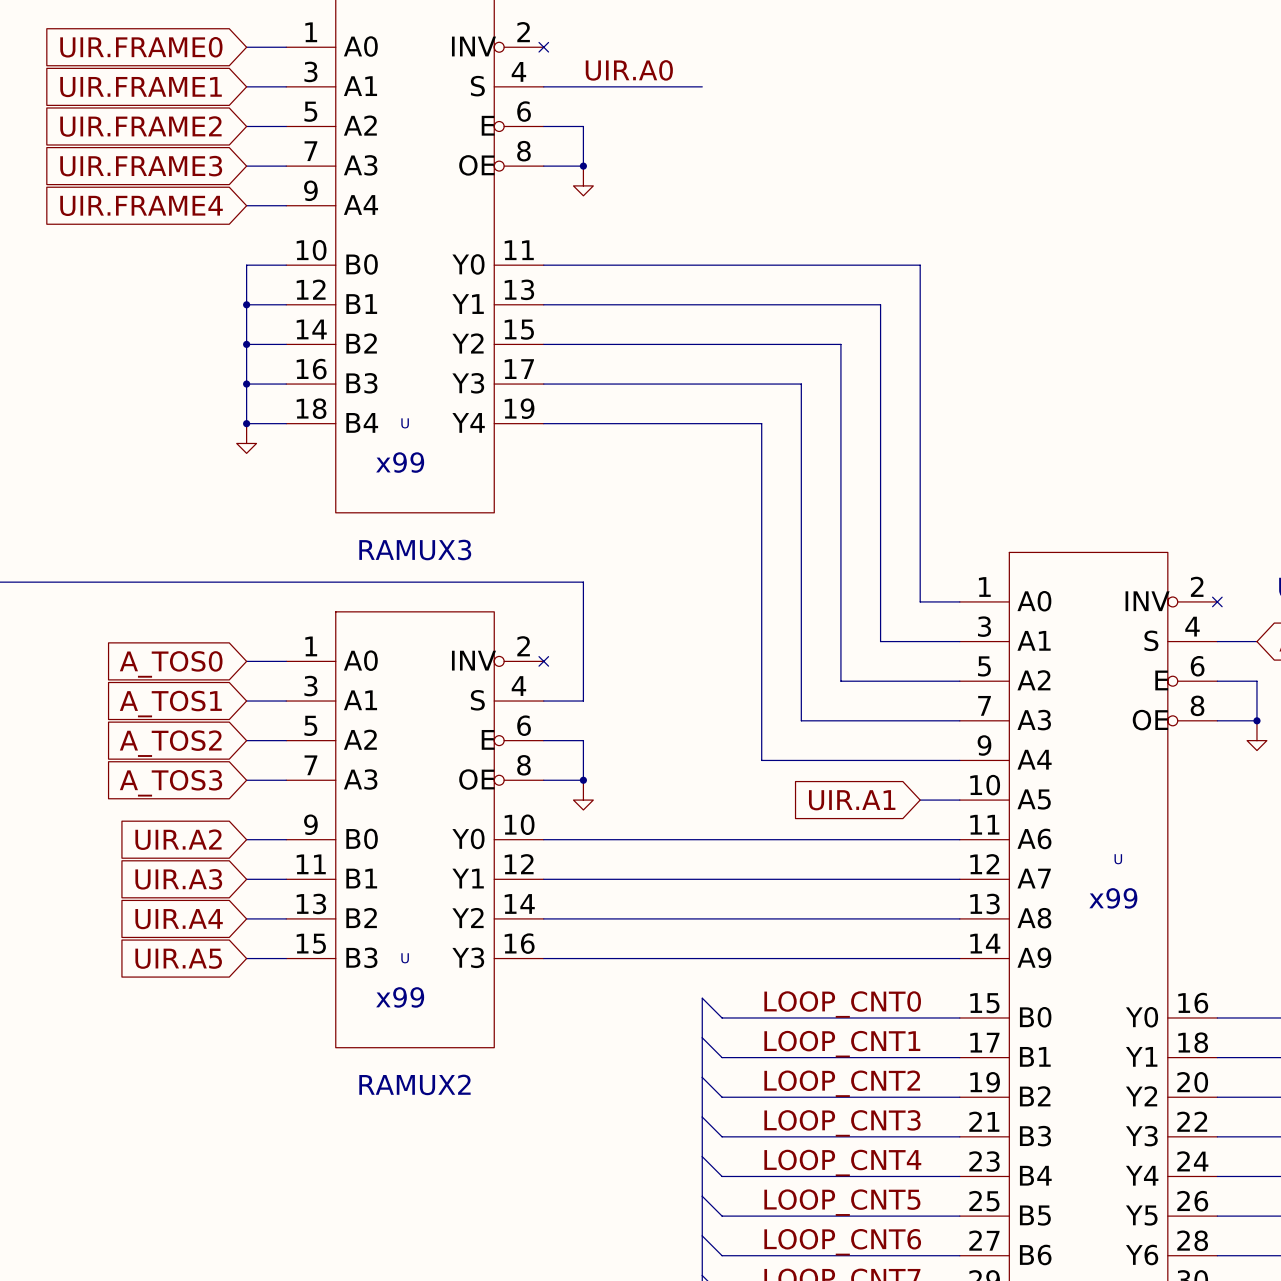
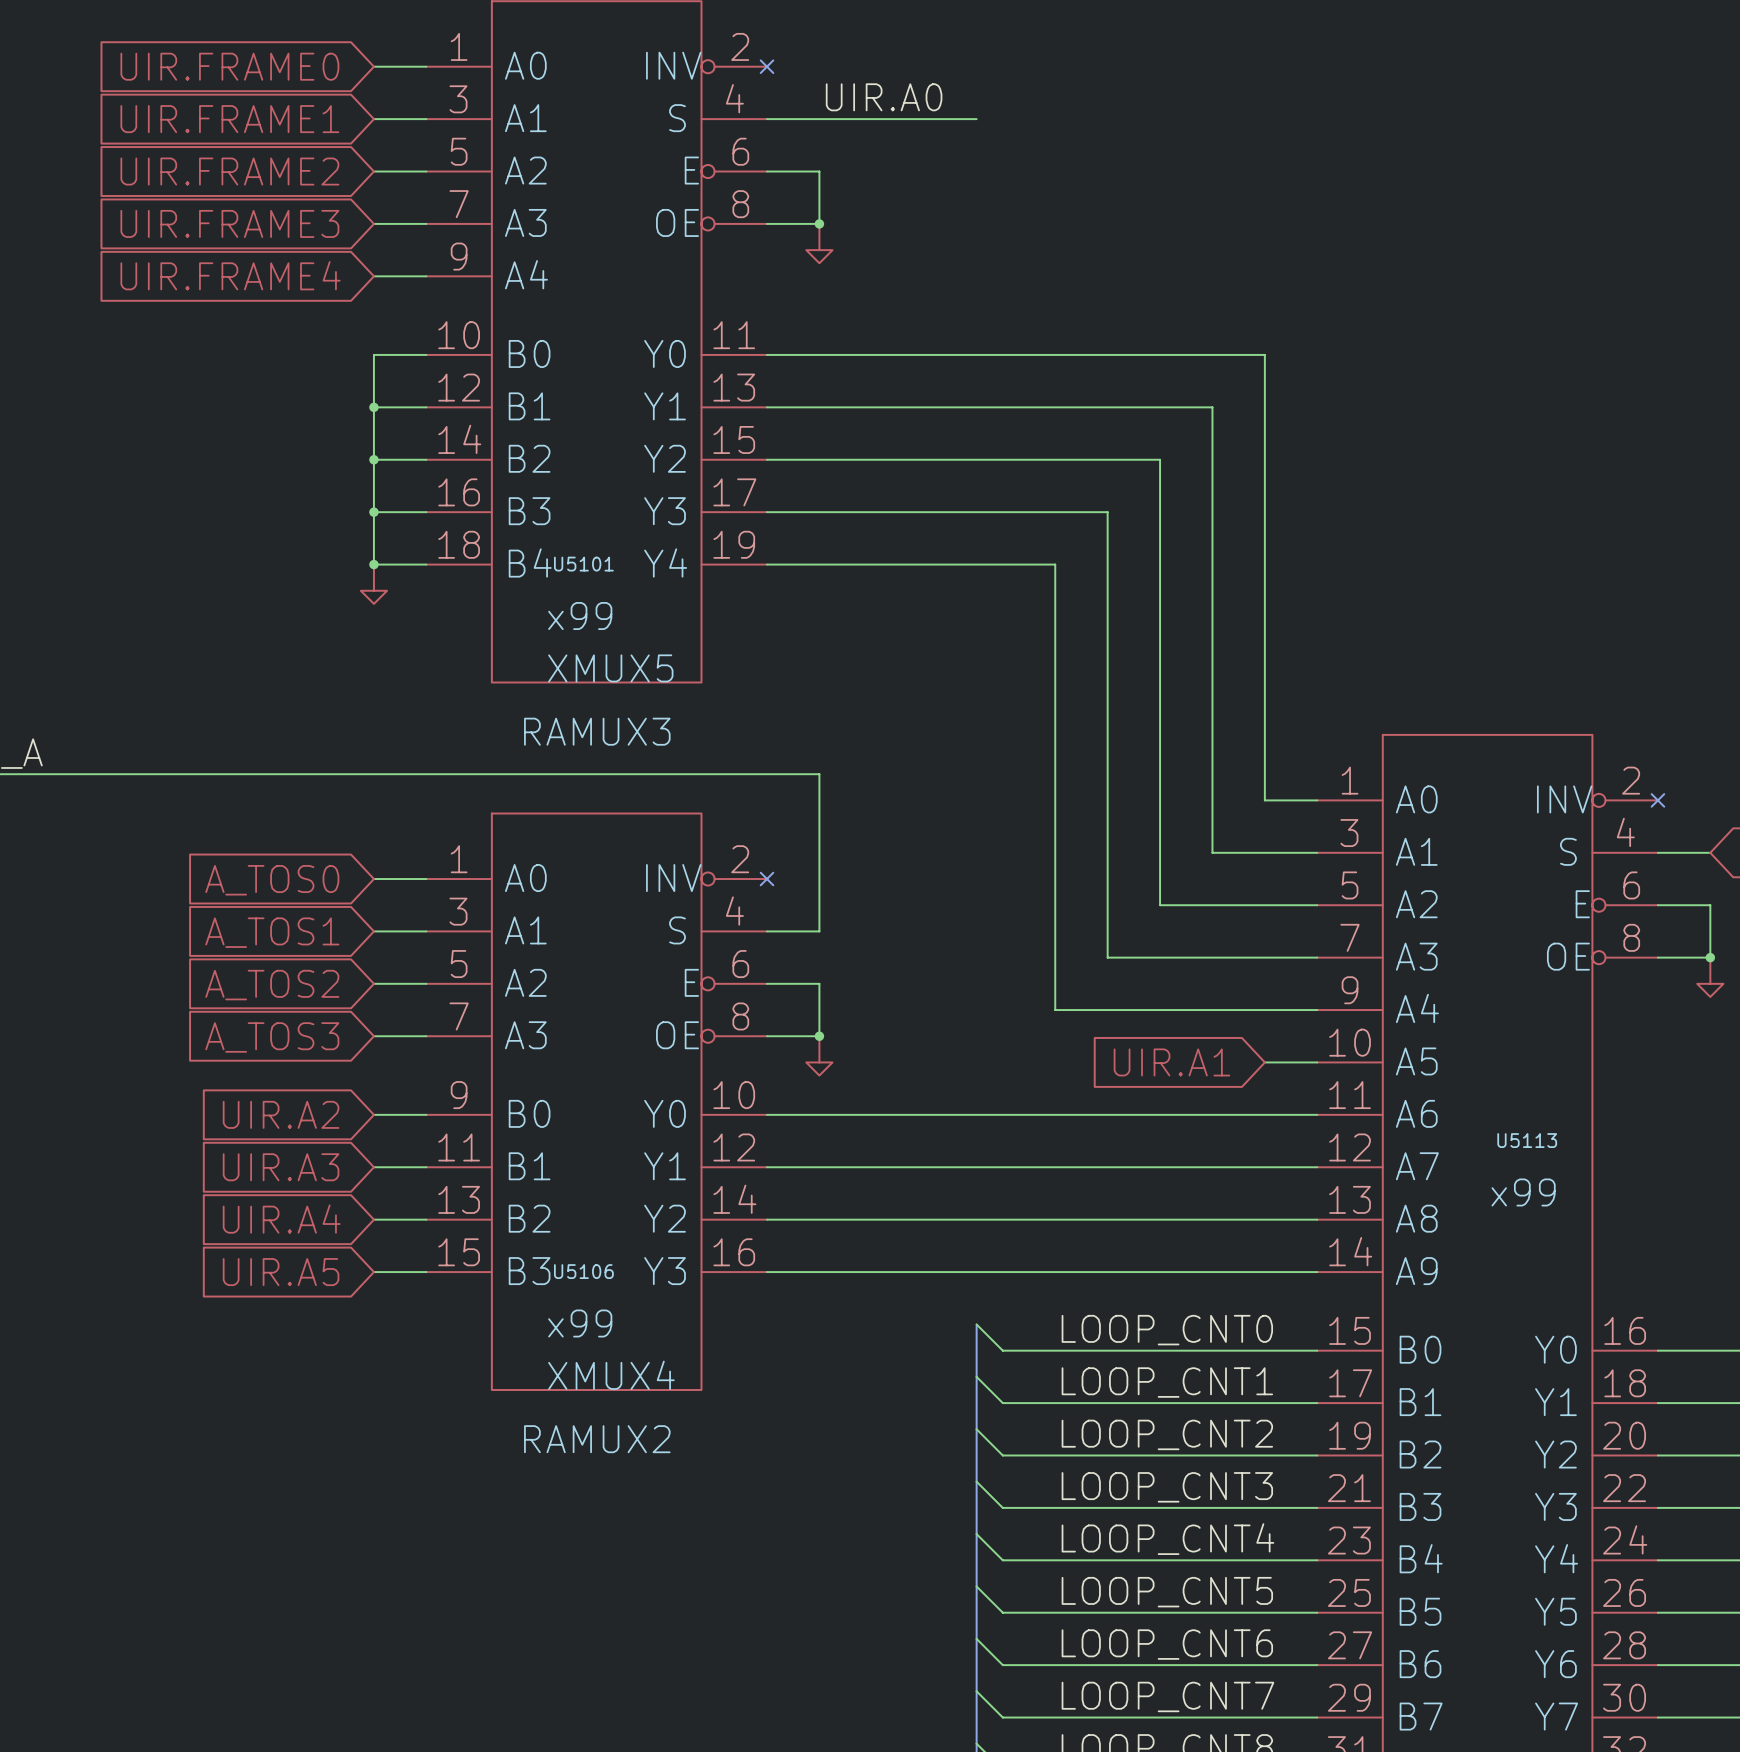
U name: U (405, 423) -> U5101 (583, 564)
U value: none -> XMUX5 (610, 668)
U name: U (1118, 859) -> U5113 (1527, 1140)
U name: U (405, 958) -> U5106 (583, 1271)
U value: none -> XMUX4 (611, 1375)

